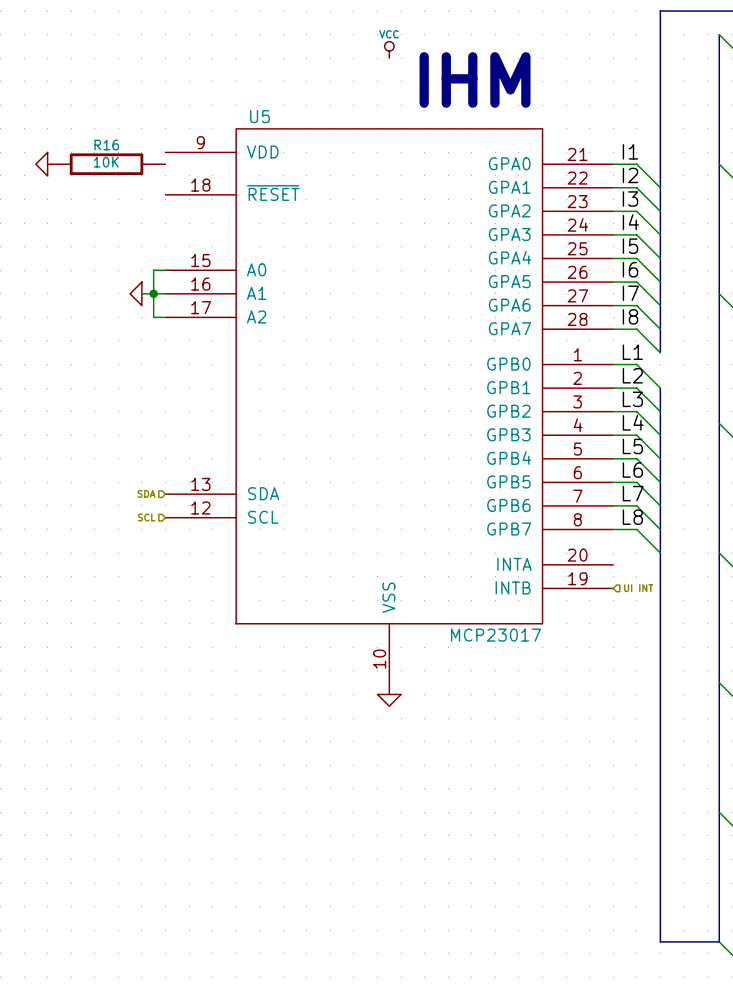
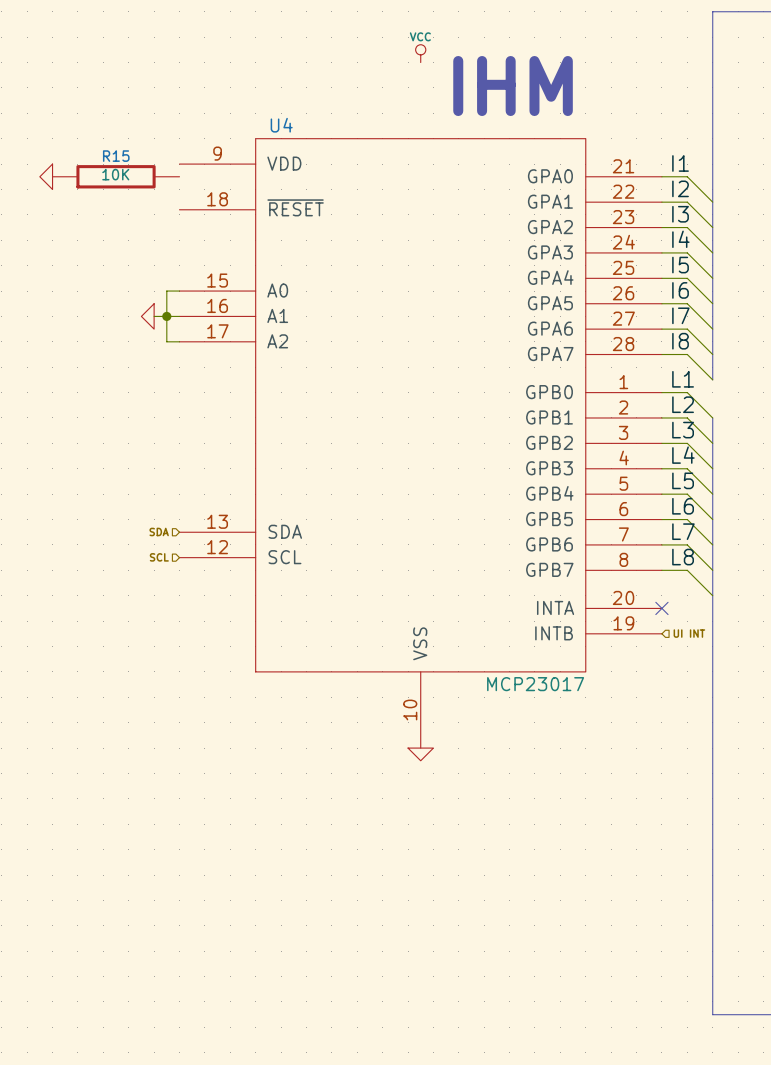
U5 name: U5 (260, 116) -> U4 (281, 125)
R16 name: R16 (106, 145) -> R15 (116, 156)
no-connect mark: none -> (661, 608)

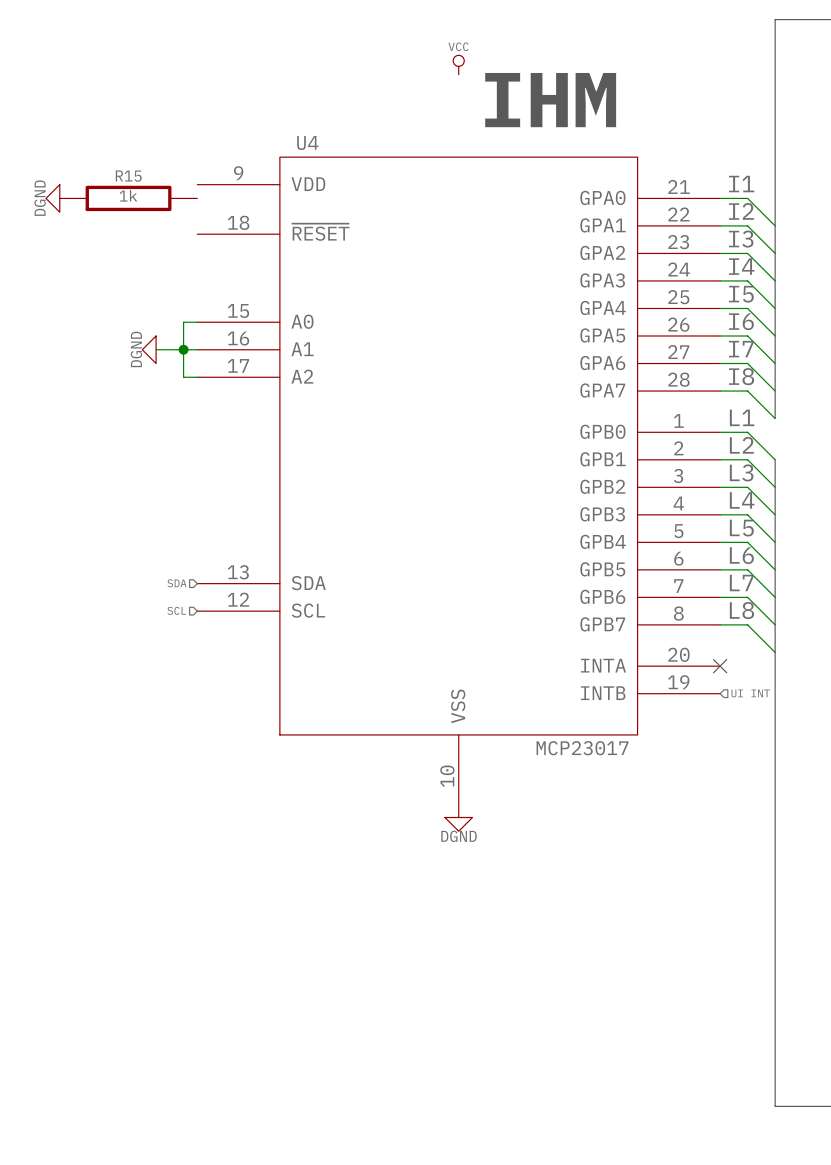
R15 value: 10K (115, 174) -> 1k (128, 195)
power symbol text: none -> DGND (40, 198)
power symbol: none -> DGND (149, 349)
wire: none -> (156, 349) (169, 349)
power symbol: (147, 316) -> none
power symbol text: none -> DGND (459, 836)

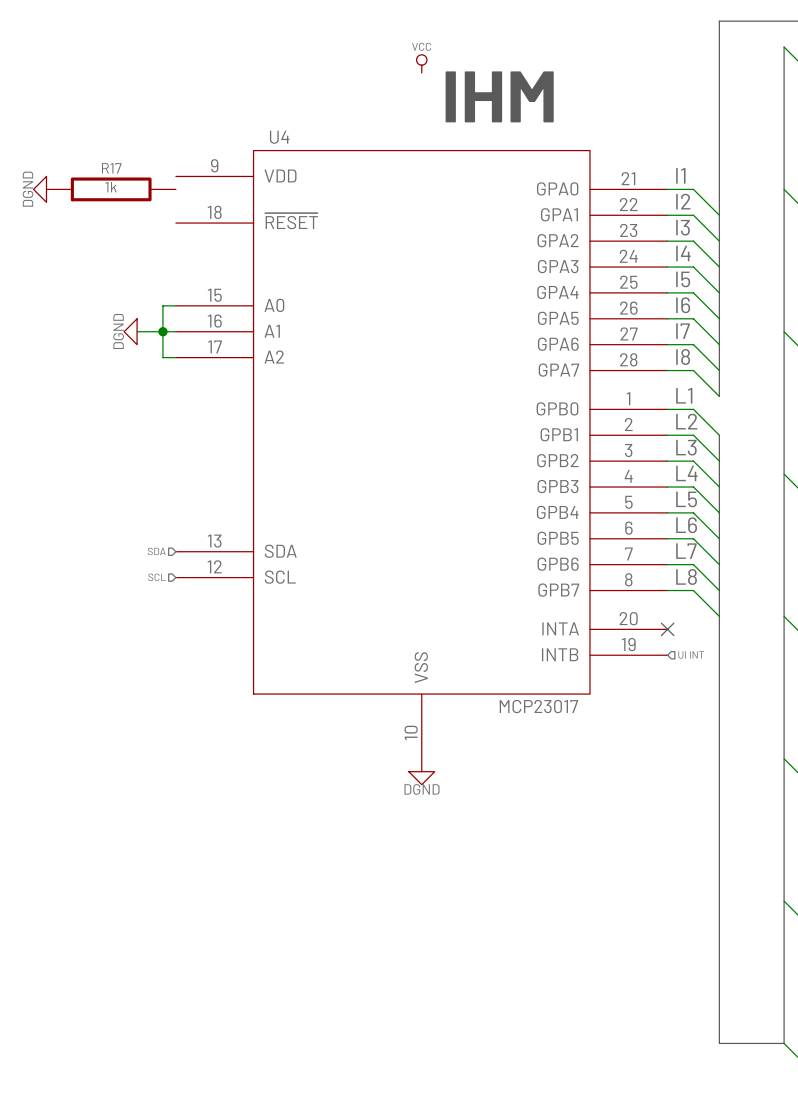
R15 name: R15 (128, 176) -> R17 (111, 168)

